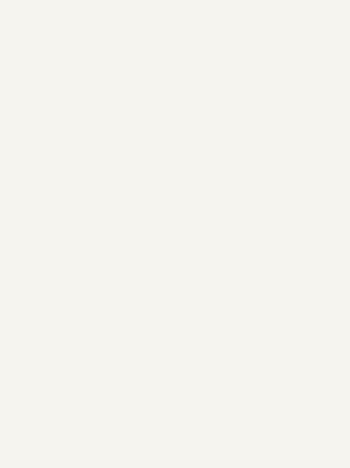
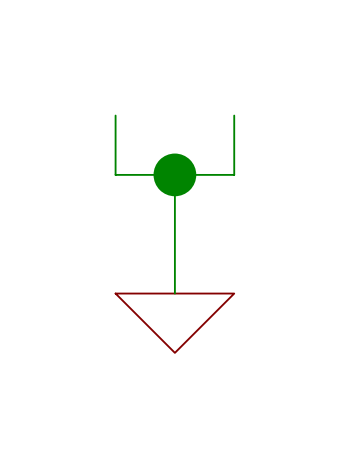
wire: none -> (115, 115) (115, 174) (234, 174) (234, 115)
wire: none -> (174, 174) (174, 293)
junction: none -> (174, 174)
power symbol: none -> (174, 323)

